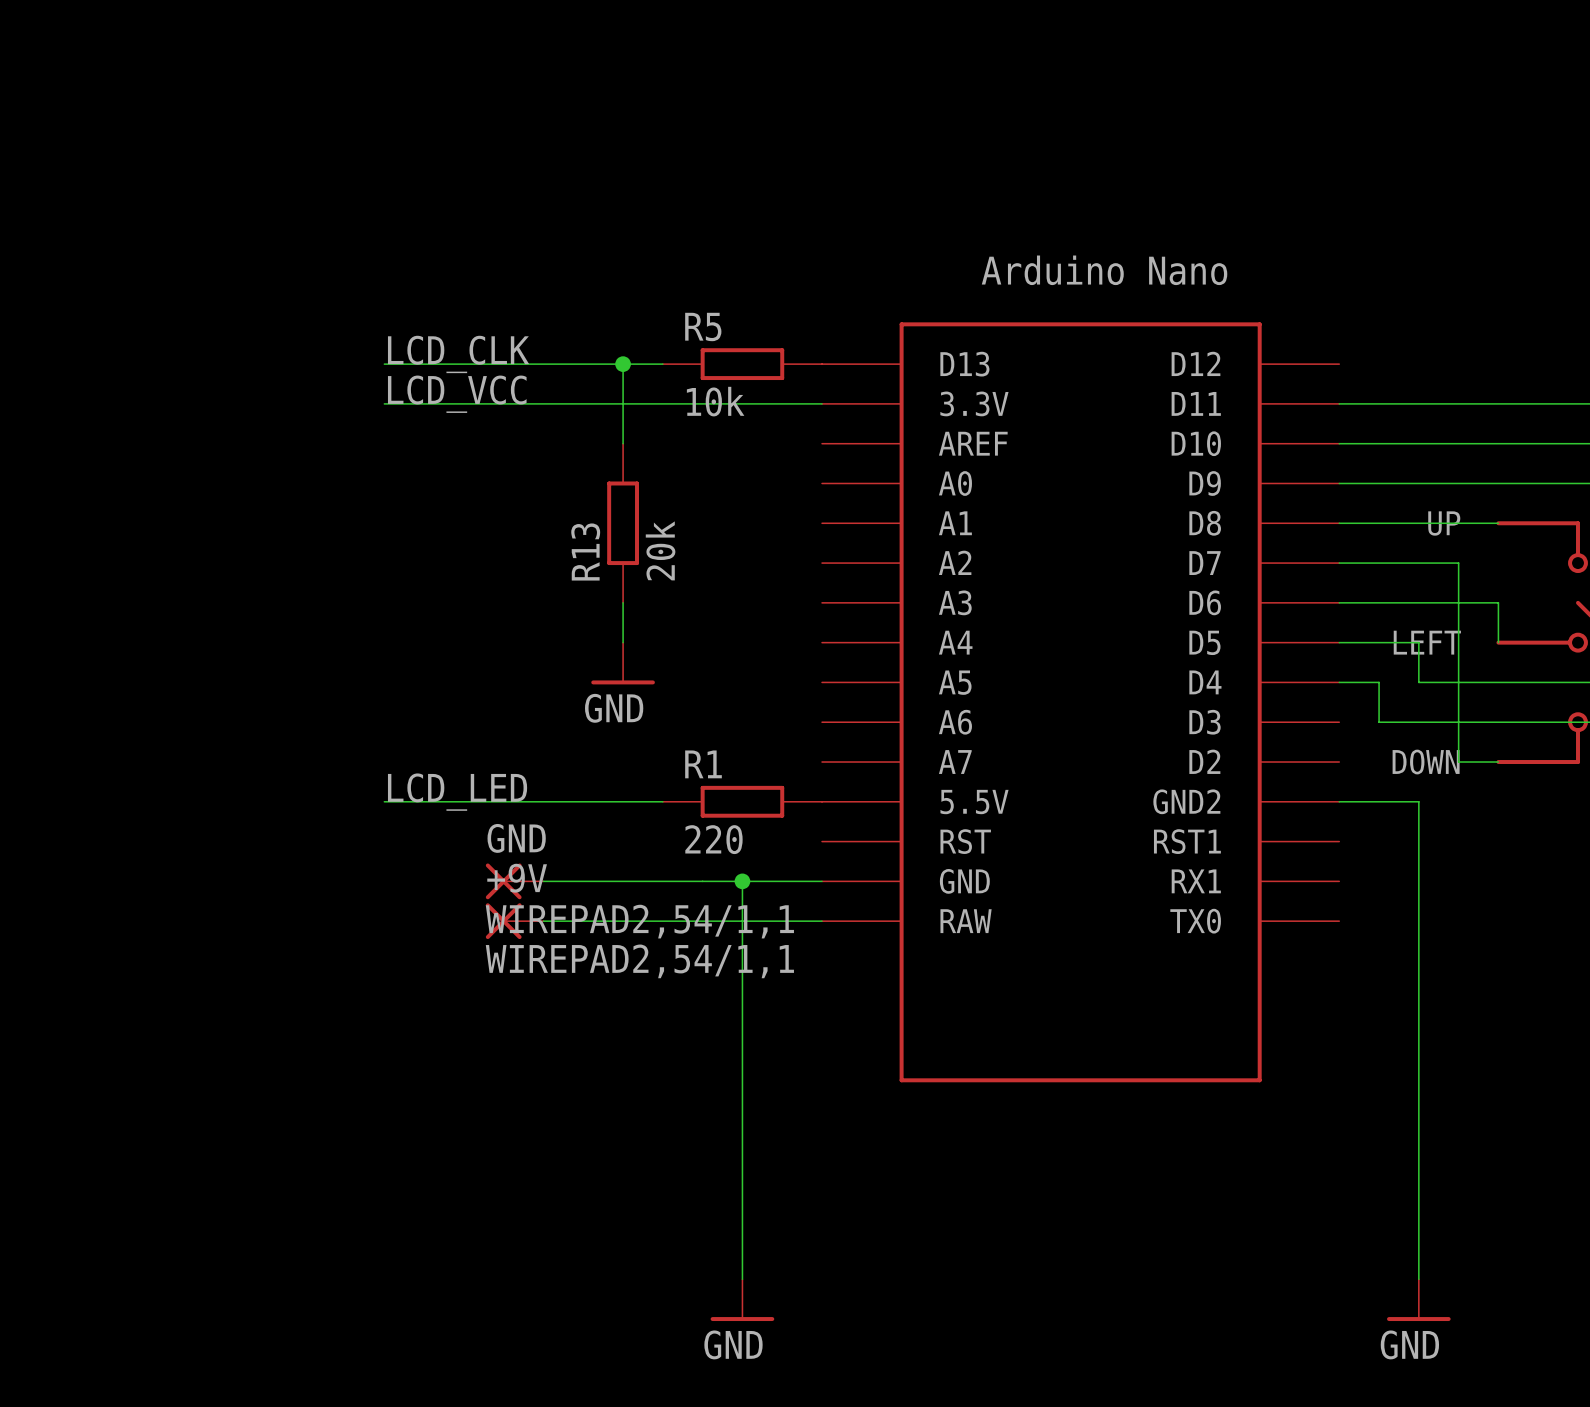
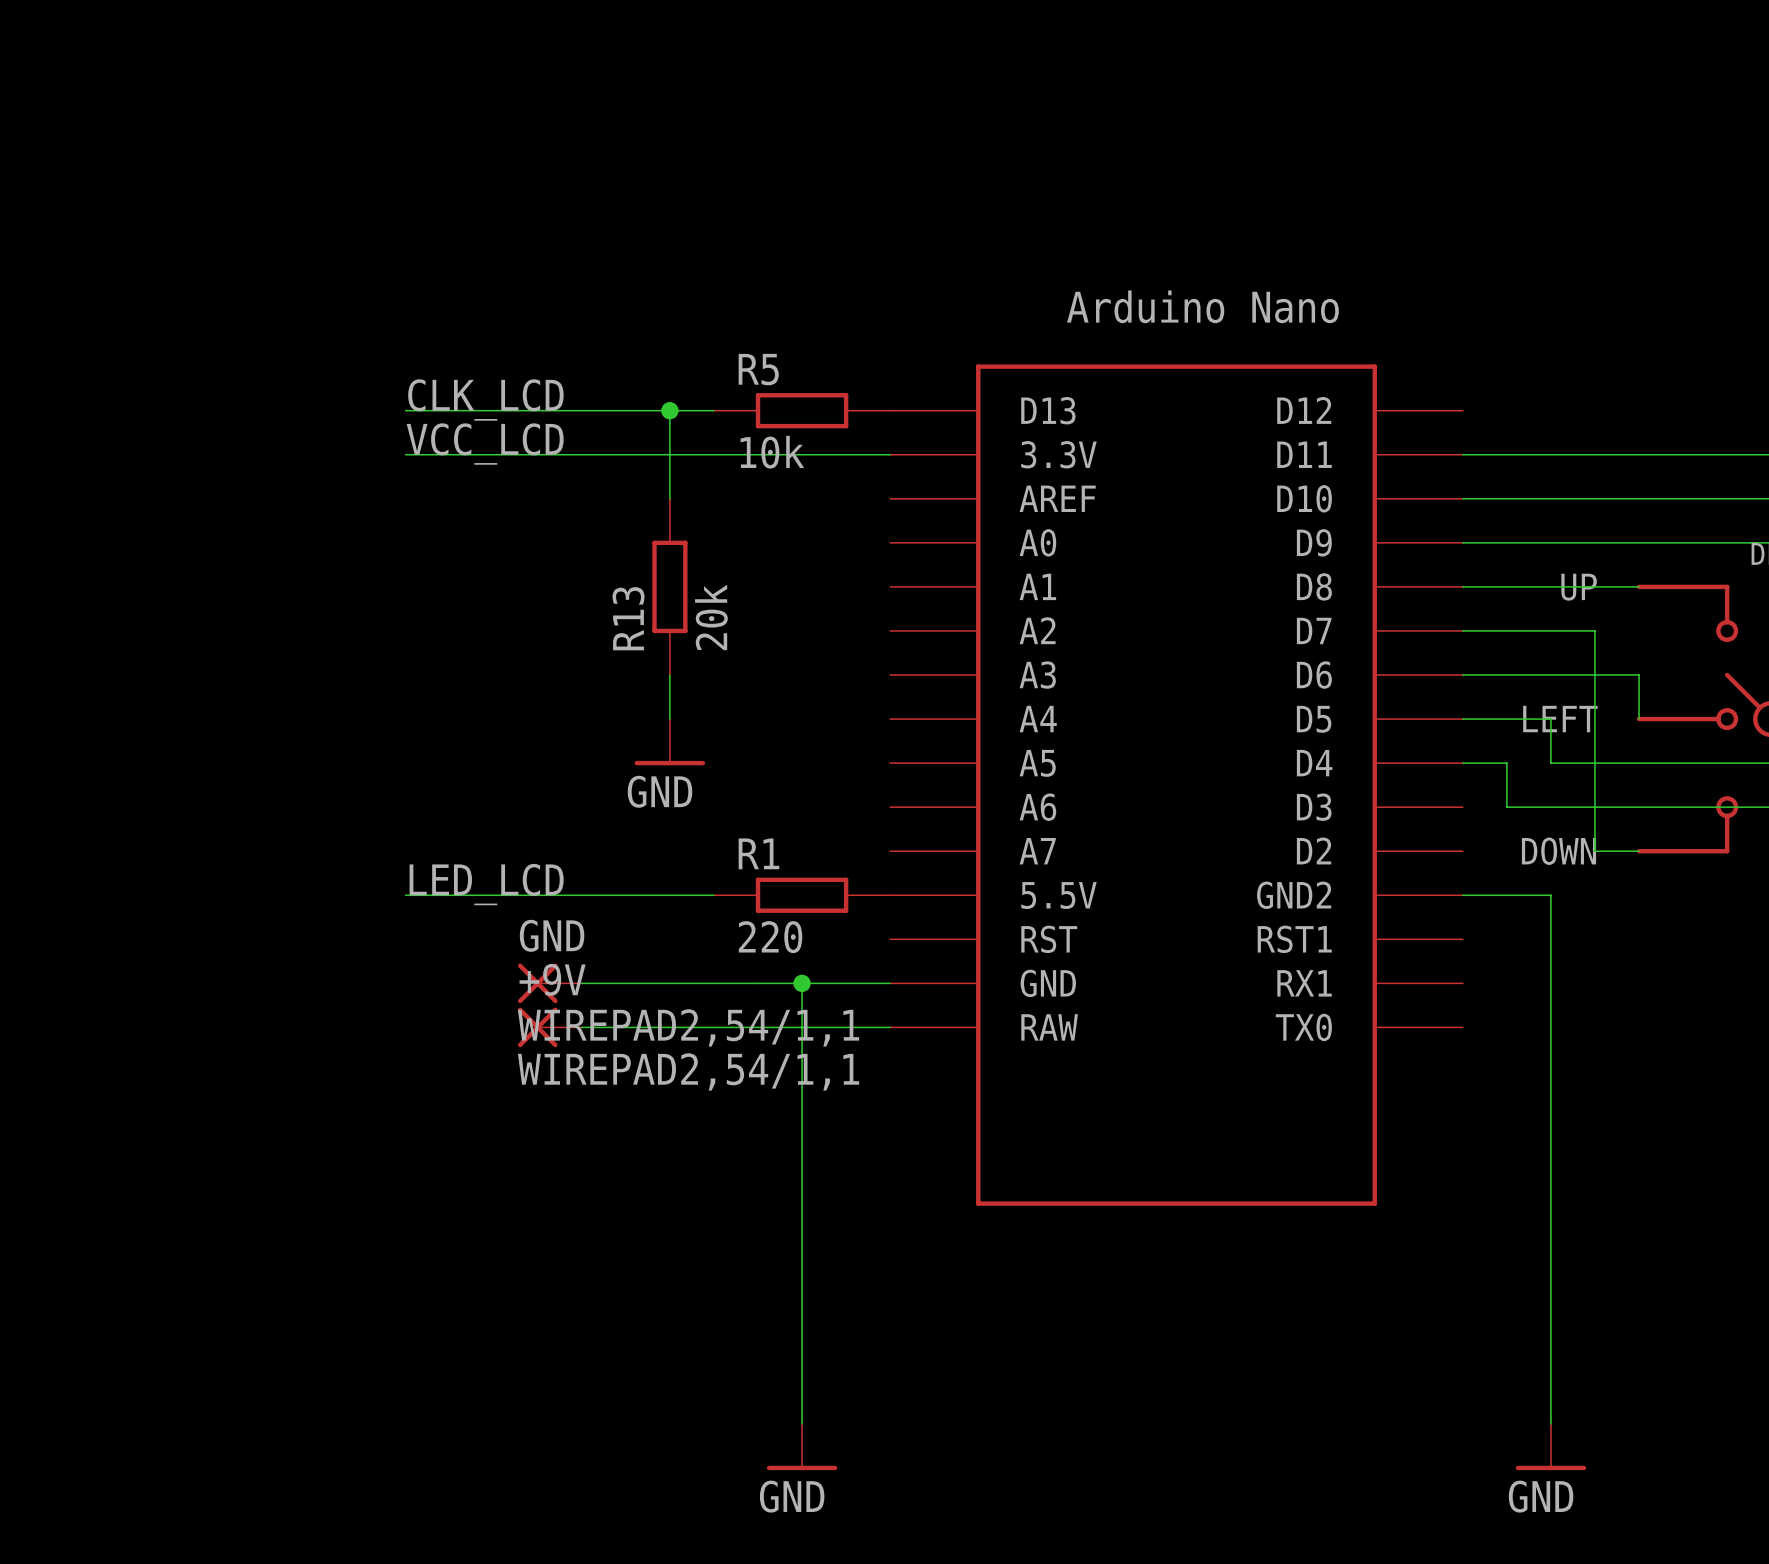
label: LCD_CLK (458, 354) -> CLK_LCD (485, 399)
label: LCD_VCC (457, 394) -> VCC_LCD (485, 444)
label: LCD_LED (457, 792) -> LED_LCD (486, 884)

